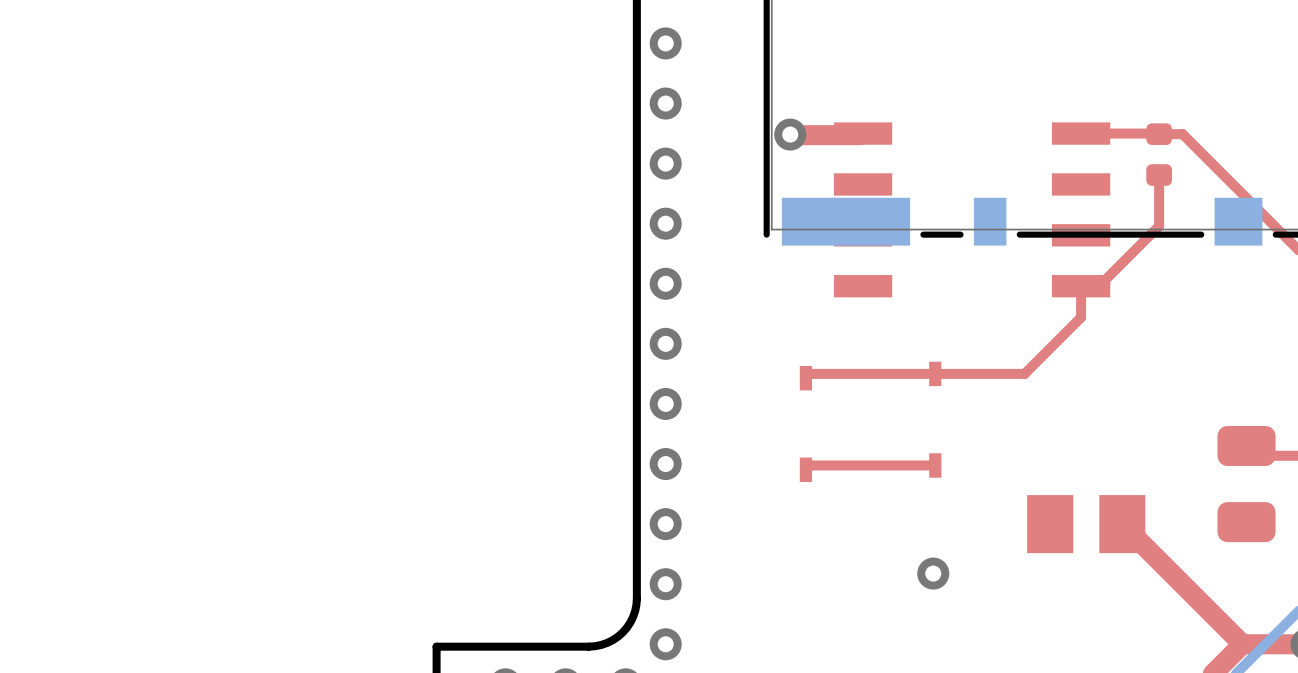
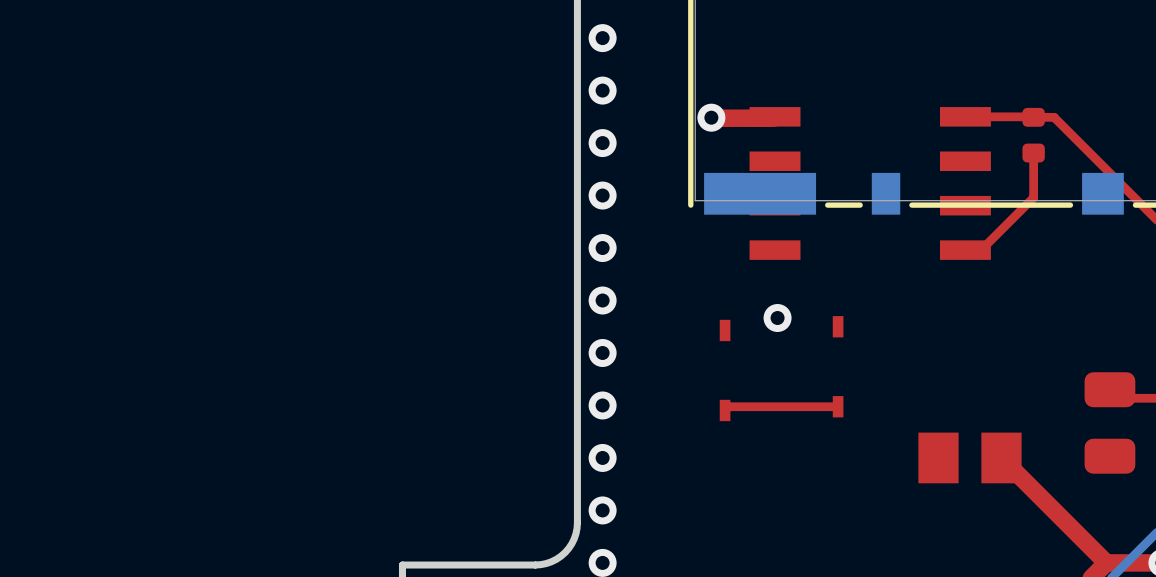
top track: (1081, 286) (1081, 317) (1024, 373) (810, 373) (805, 378) -> none
via position: (933, 573) -> (777, 318)

